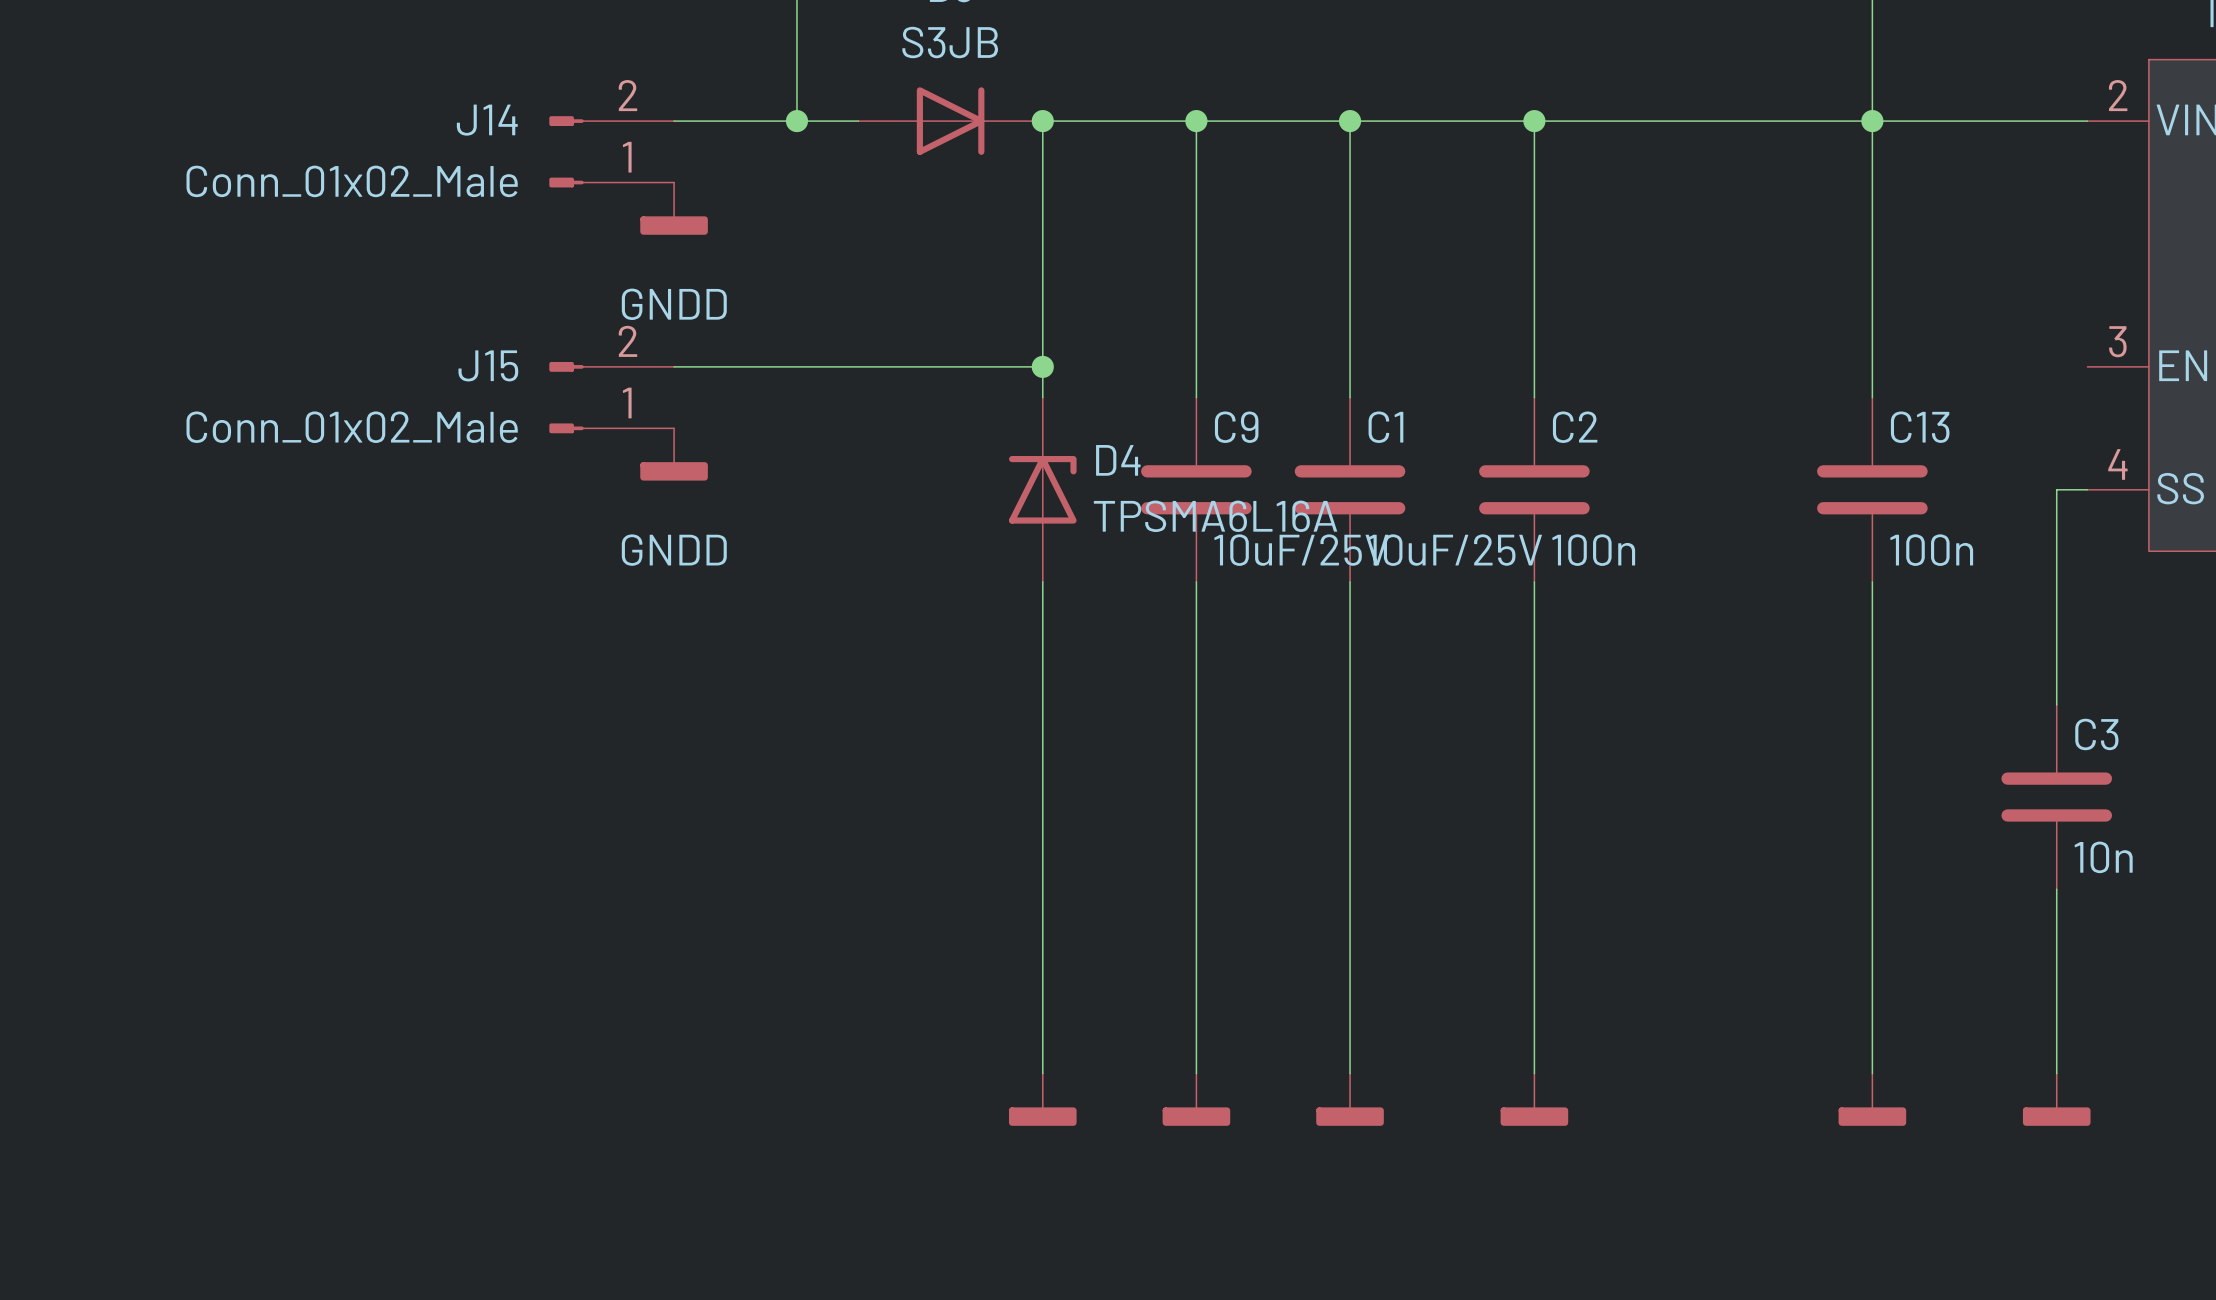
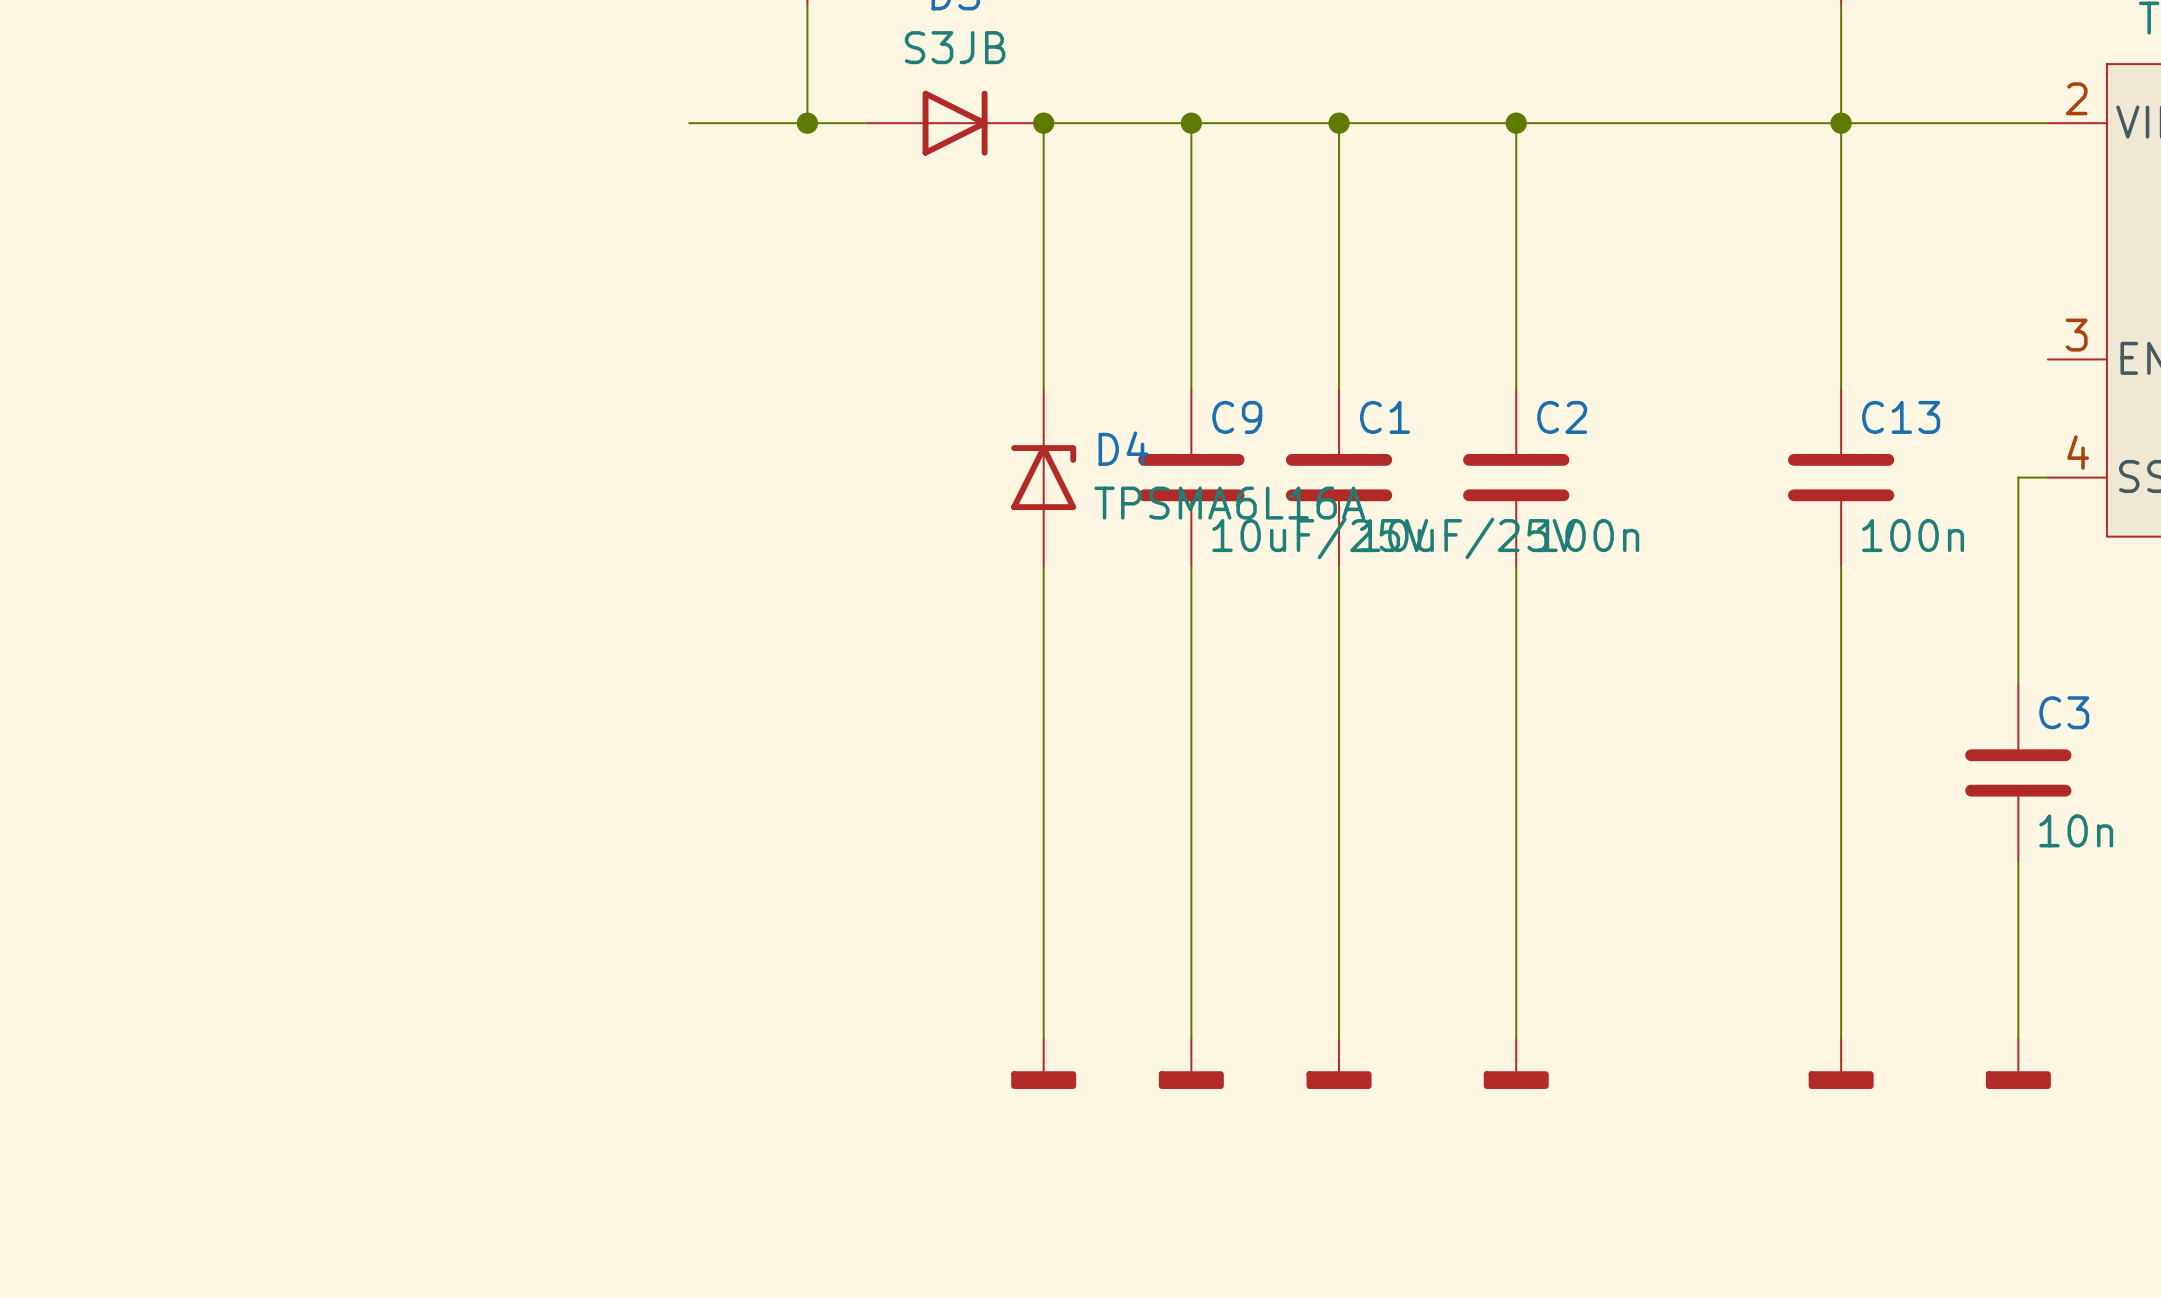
J14: Conn_01x02_Male (611, 151) -> none
power symbol: GNDD (674, 208) -> none
wire: (674, 366) (1042, 366) -> none
junction: (1042, 366) -> none
J15: Conn_01x02_Male (611, 397) -> none
power symbol: GNDD (674, 454) -> none

